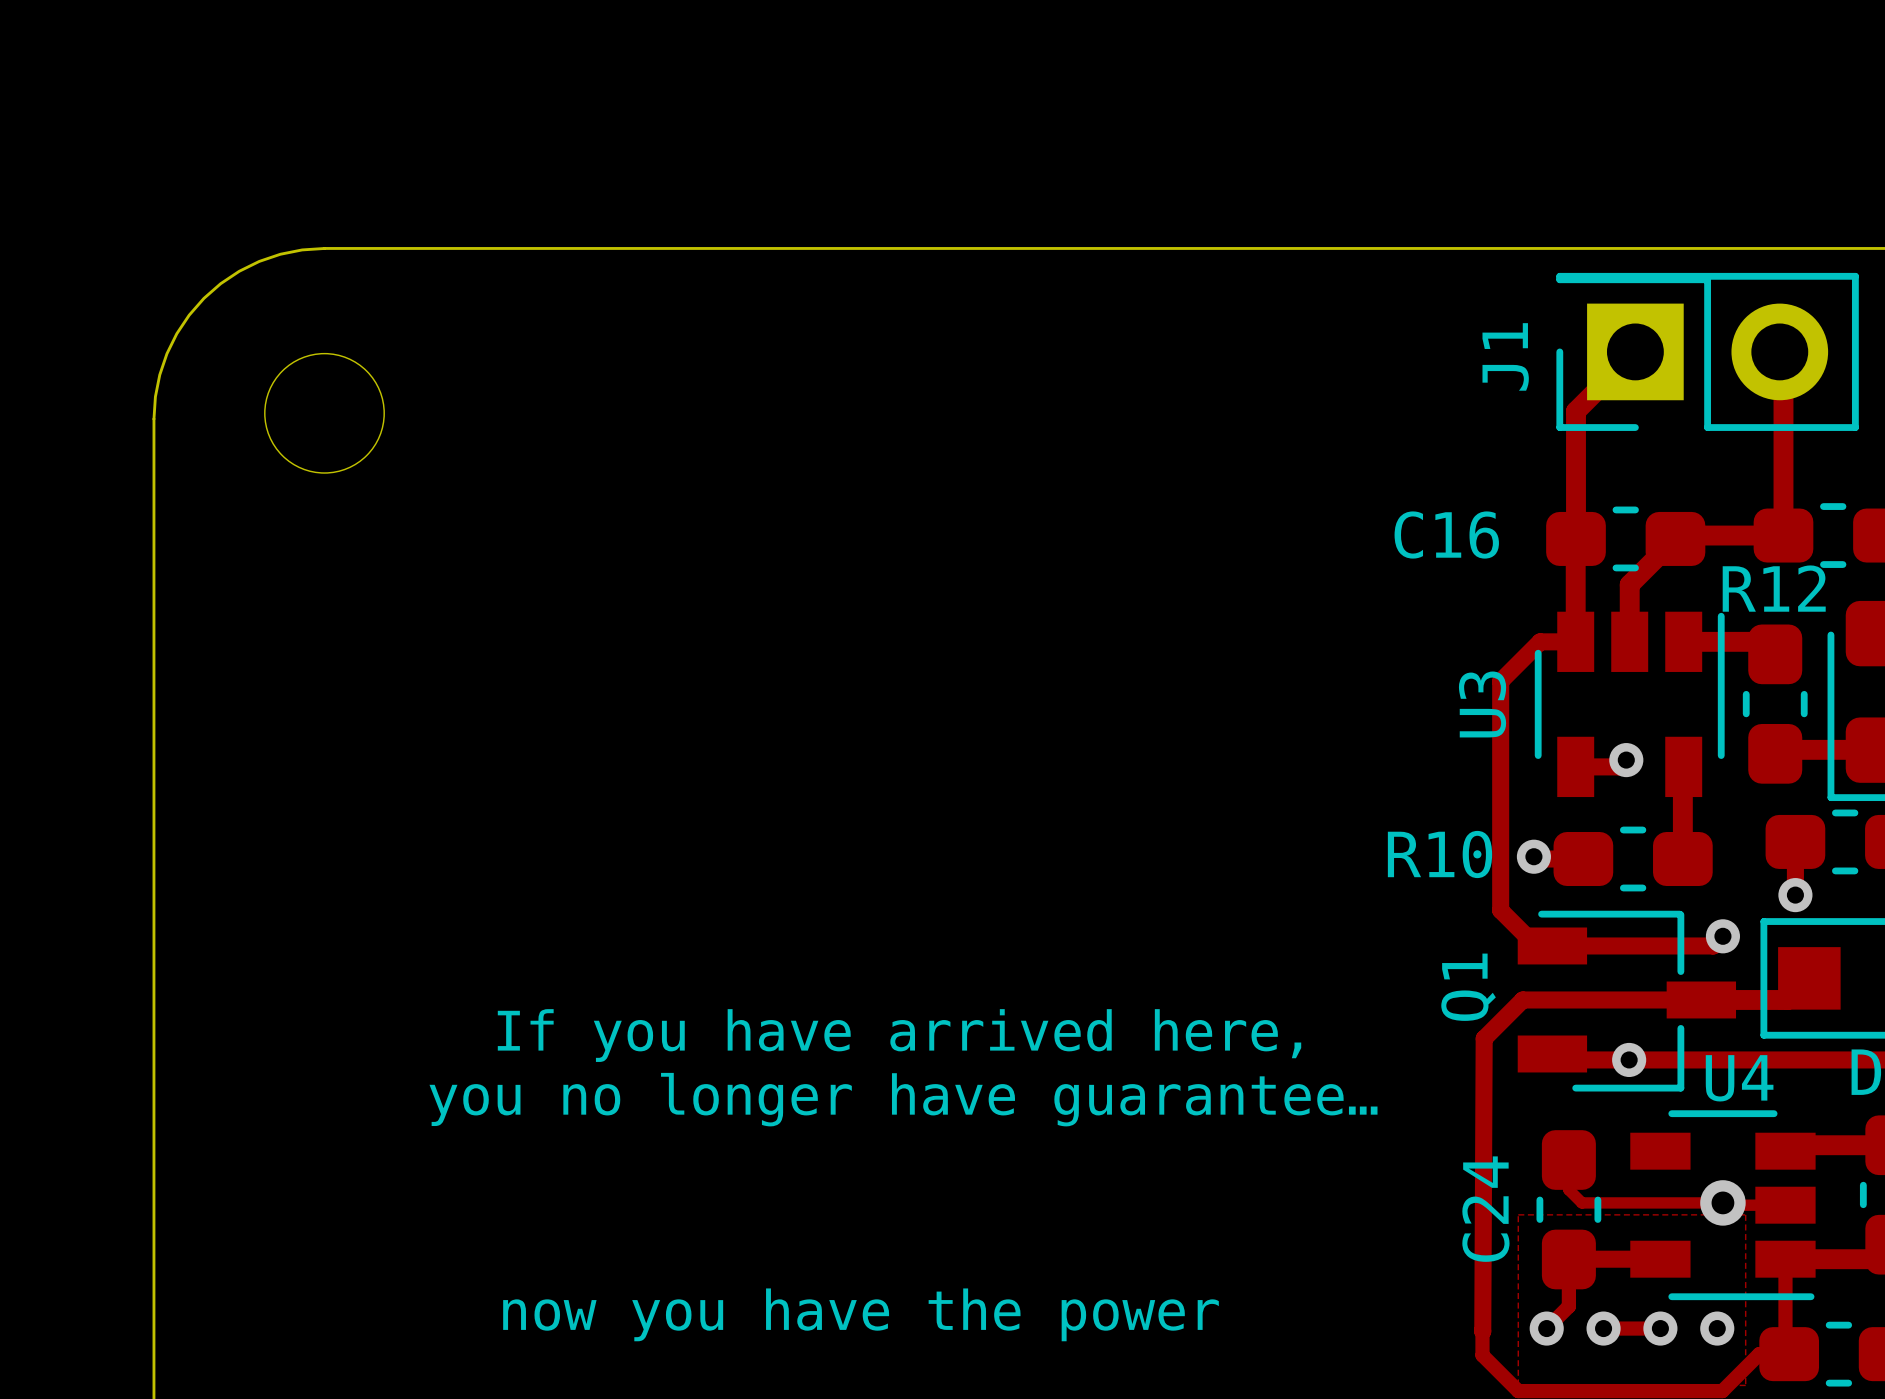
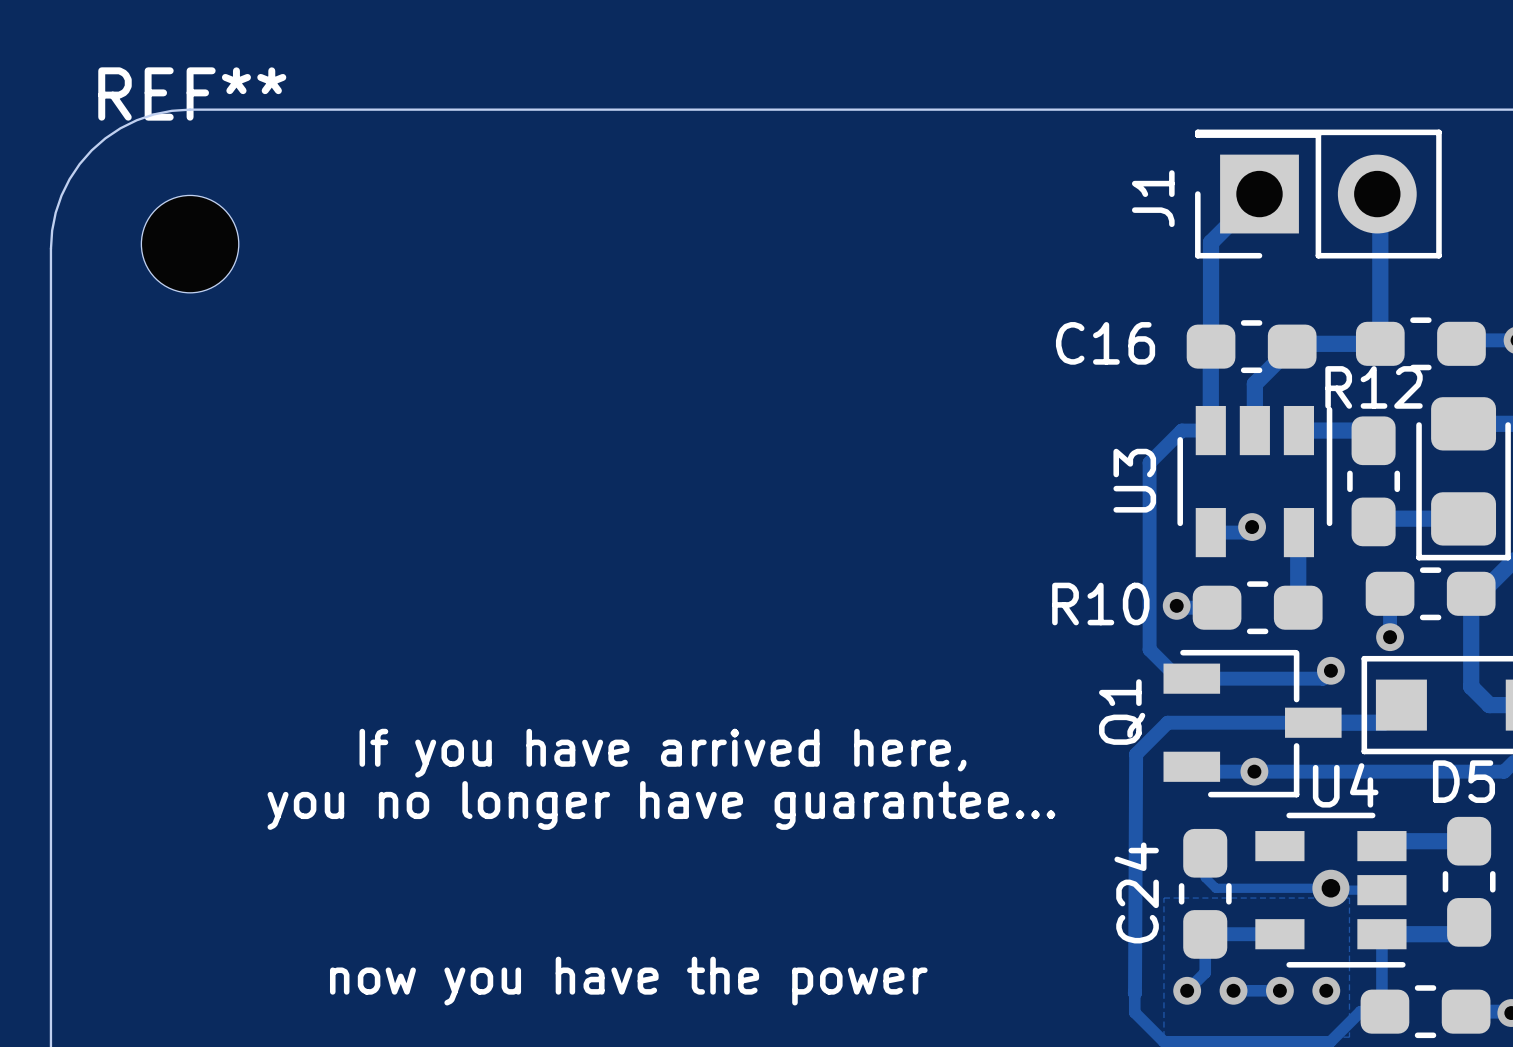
REF** name: none -> REF** (192, 93)

